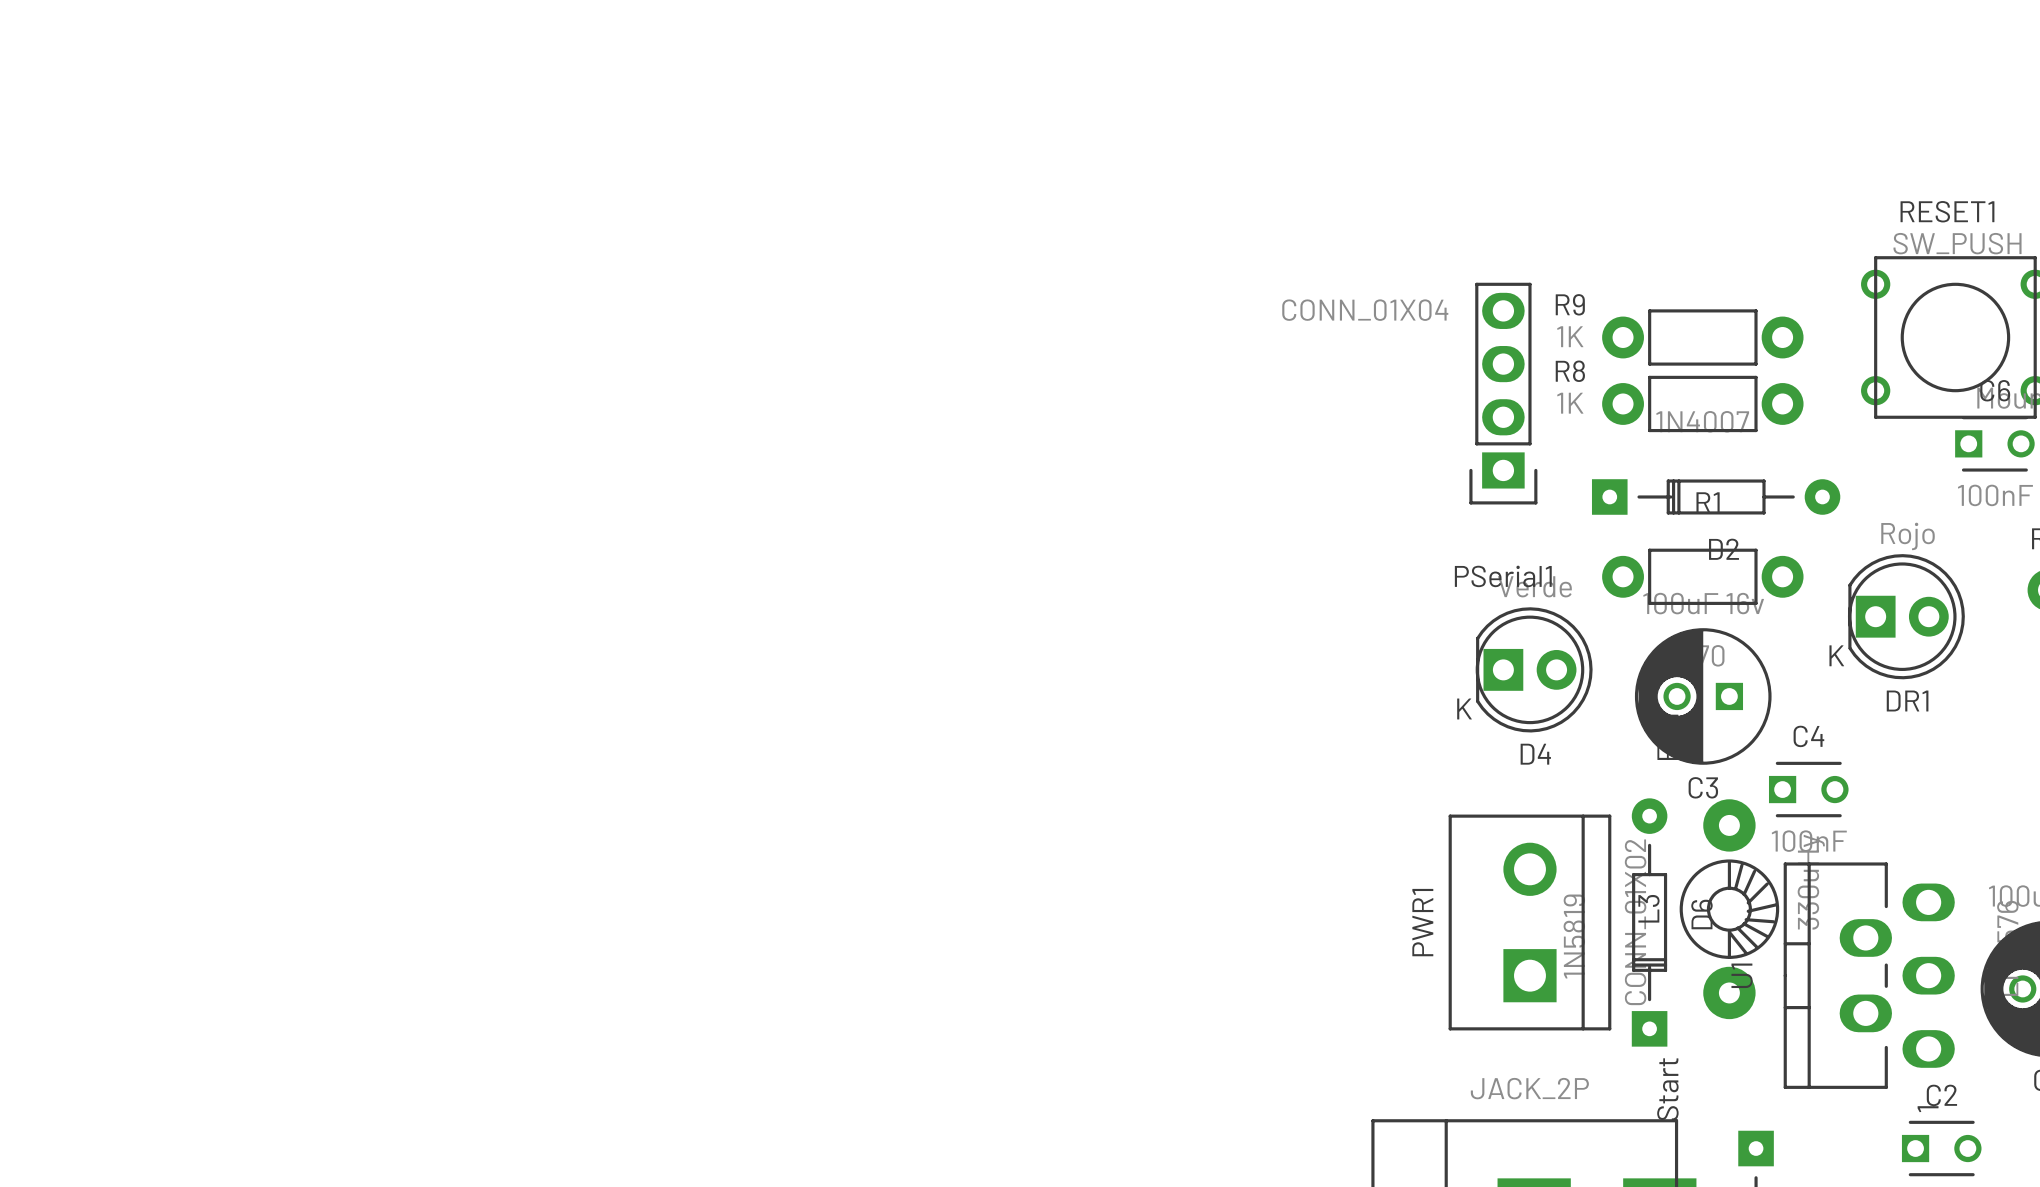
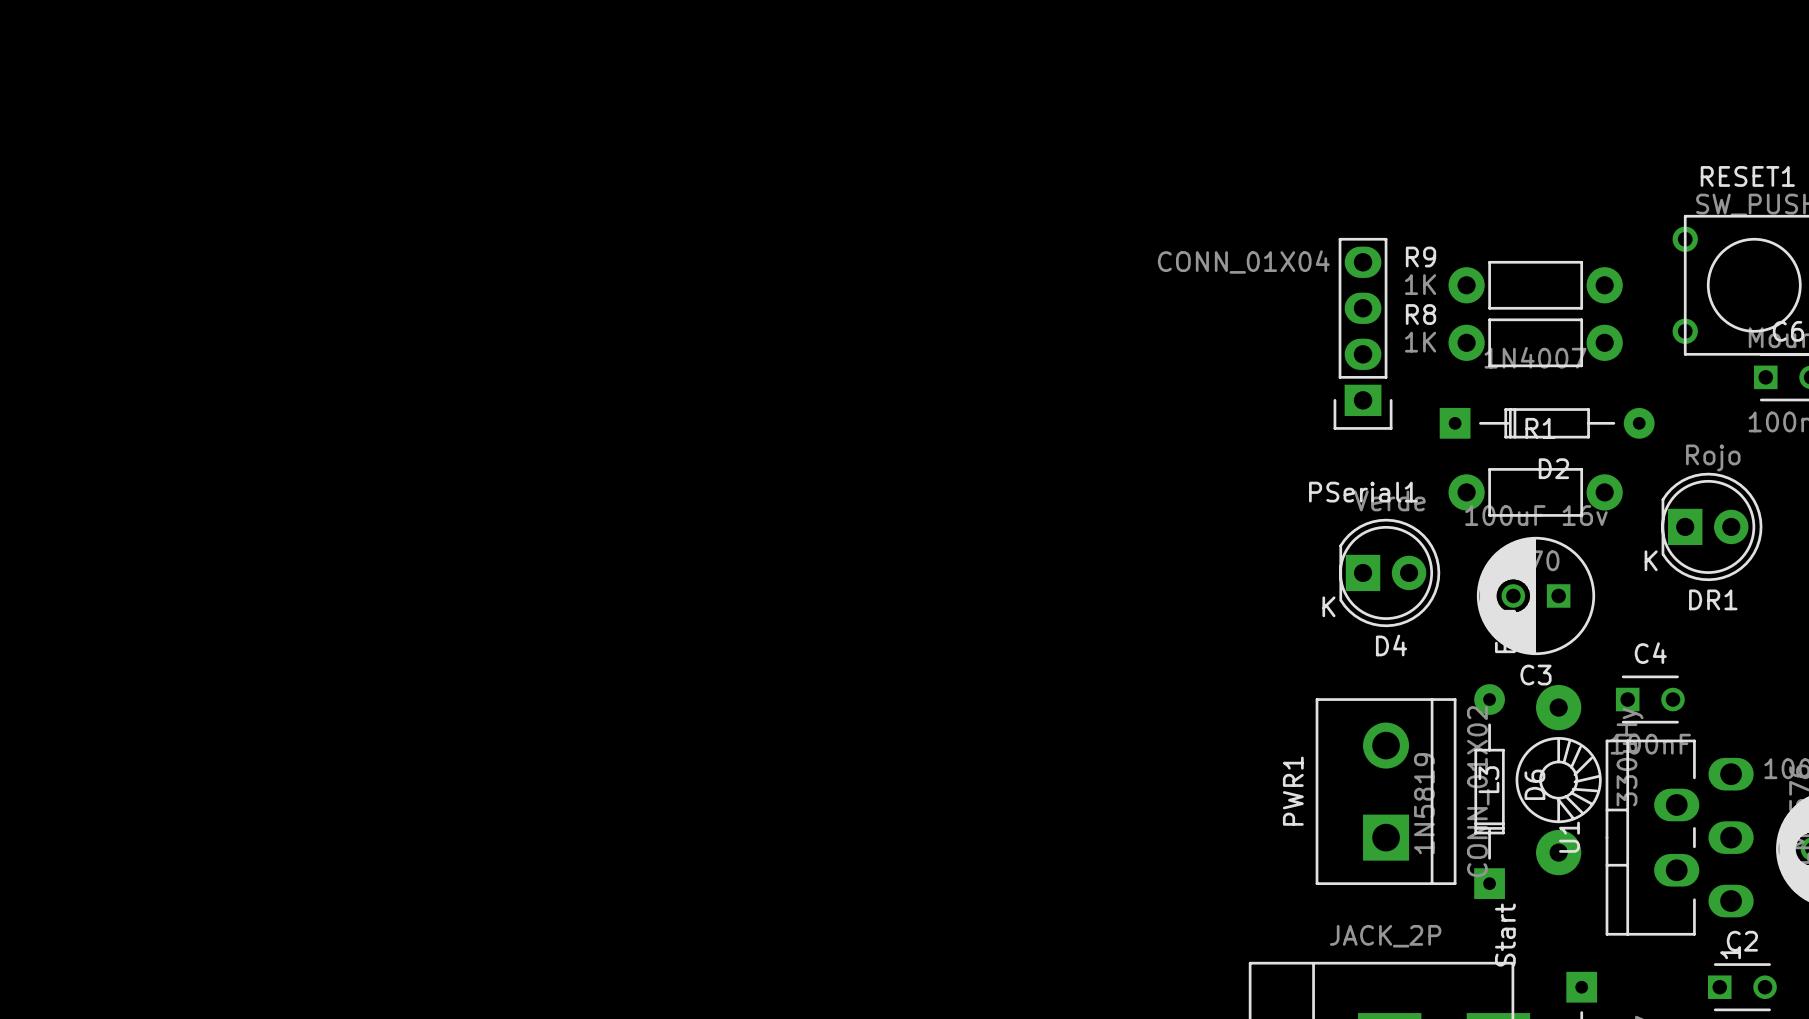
C4 position: (1808, 789) -> (1650, 699)

